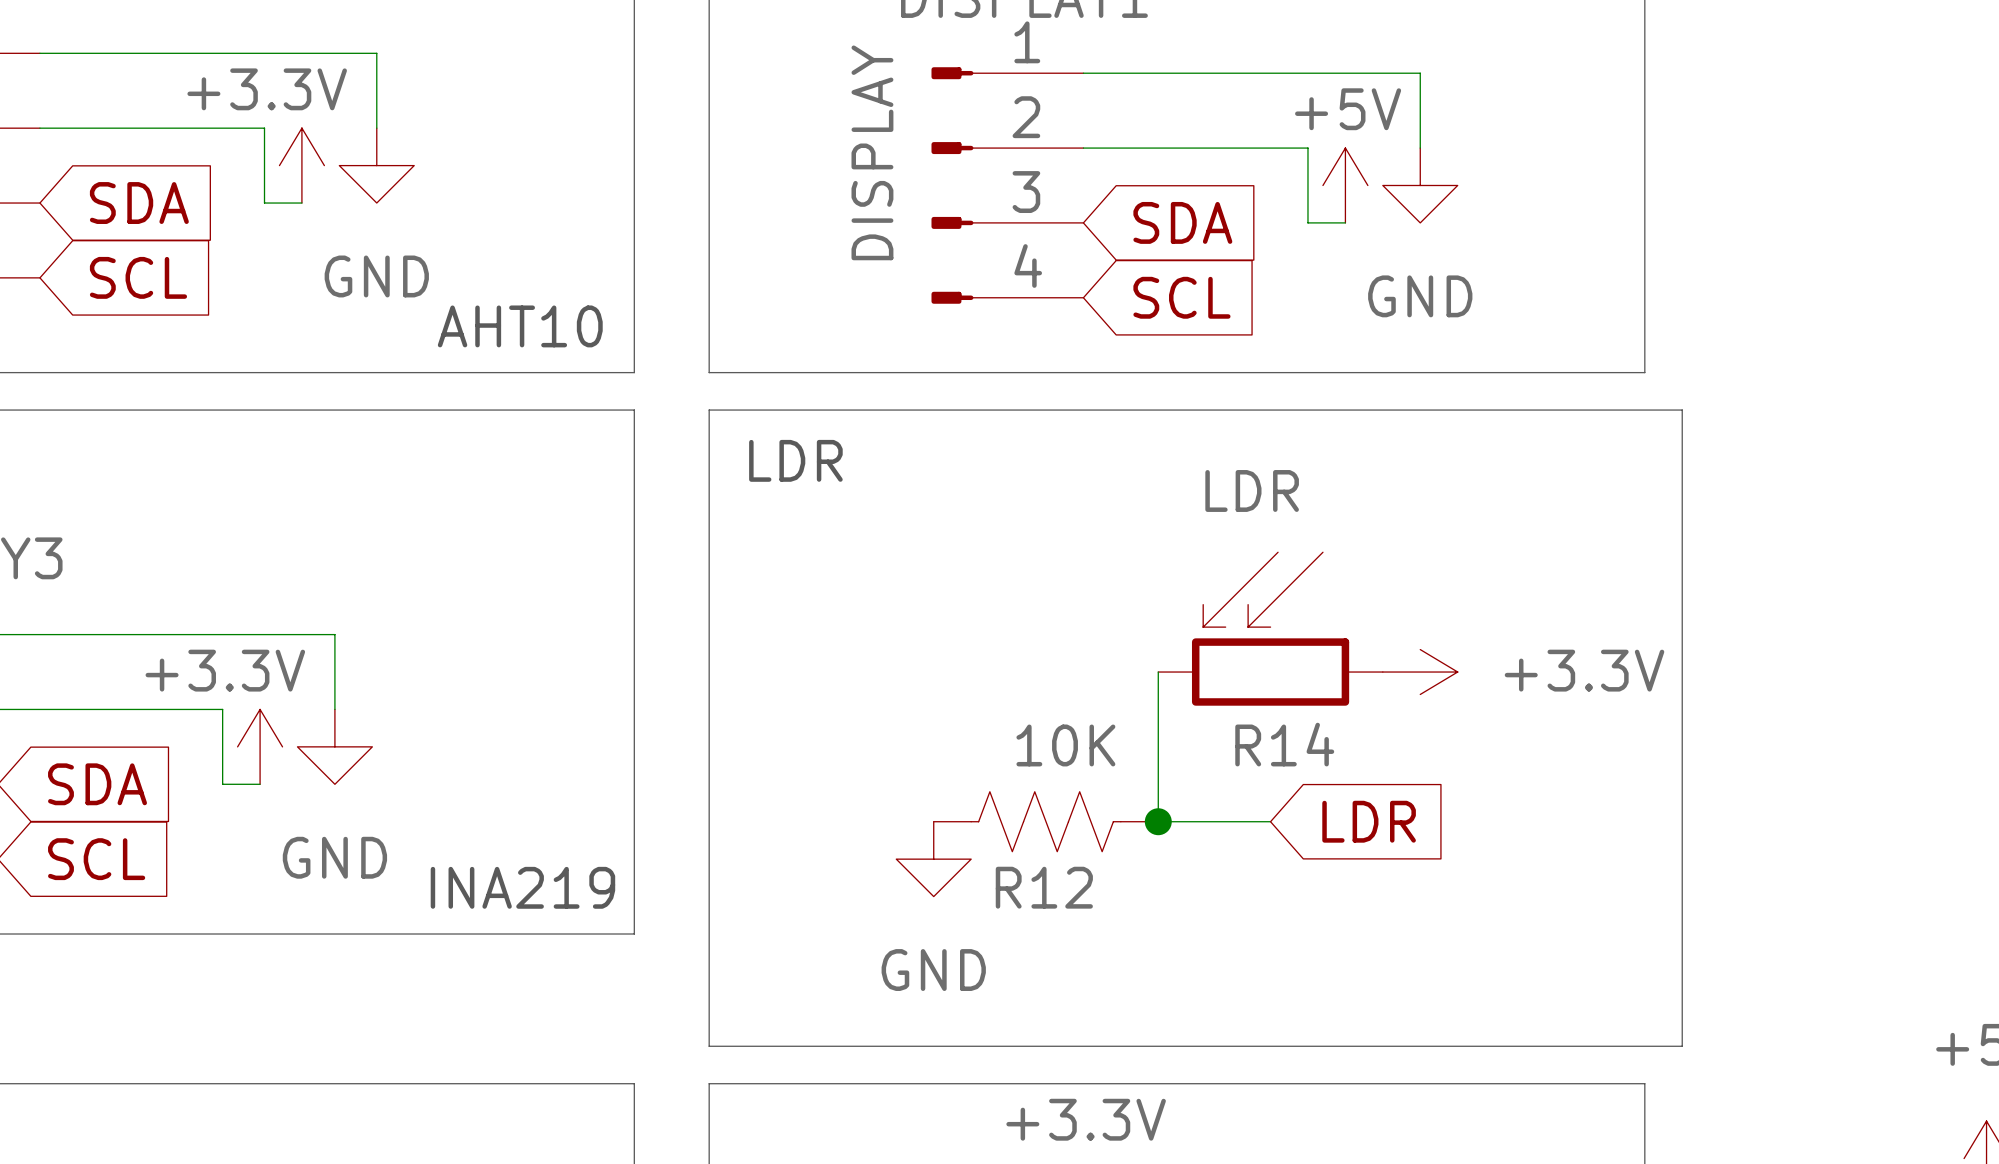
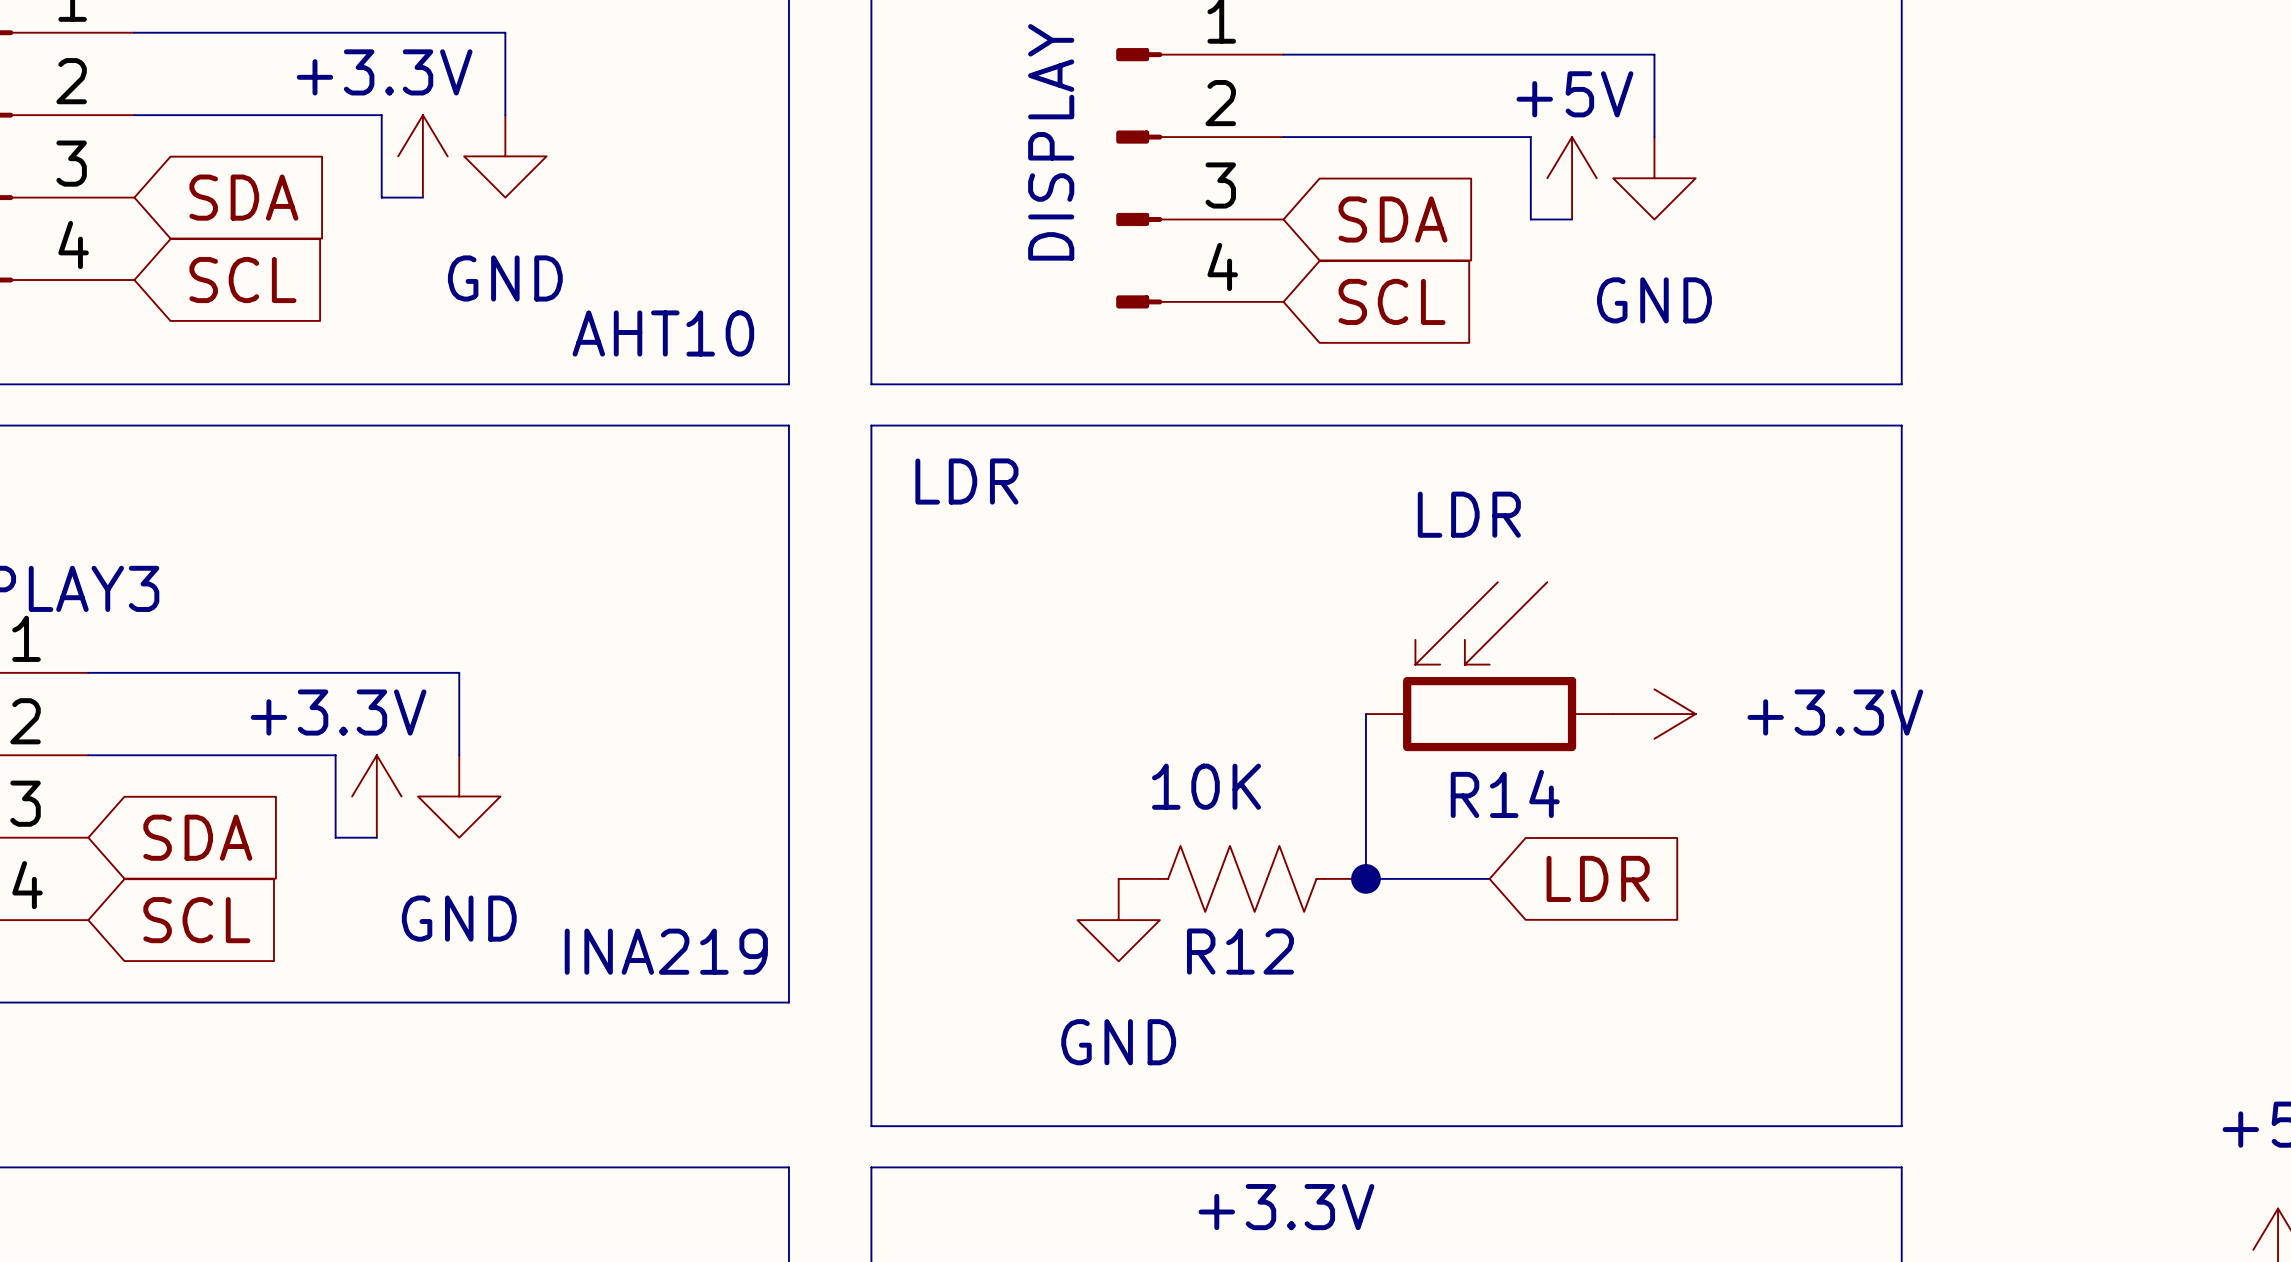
line: (1644, 410) (1682, 410) (1682, 1046) (1644, 1046) -> (1901, 425) (1901, 1126)
R12 value position: 10K (1065, 745) -> 10K (1206, 786)

